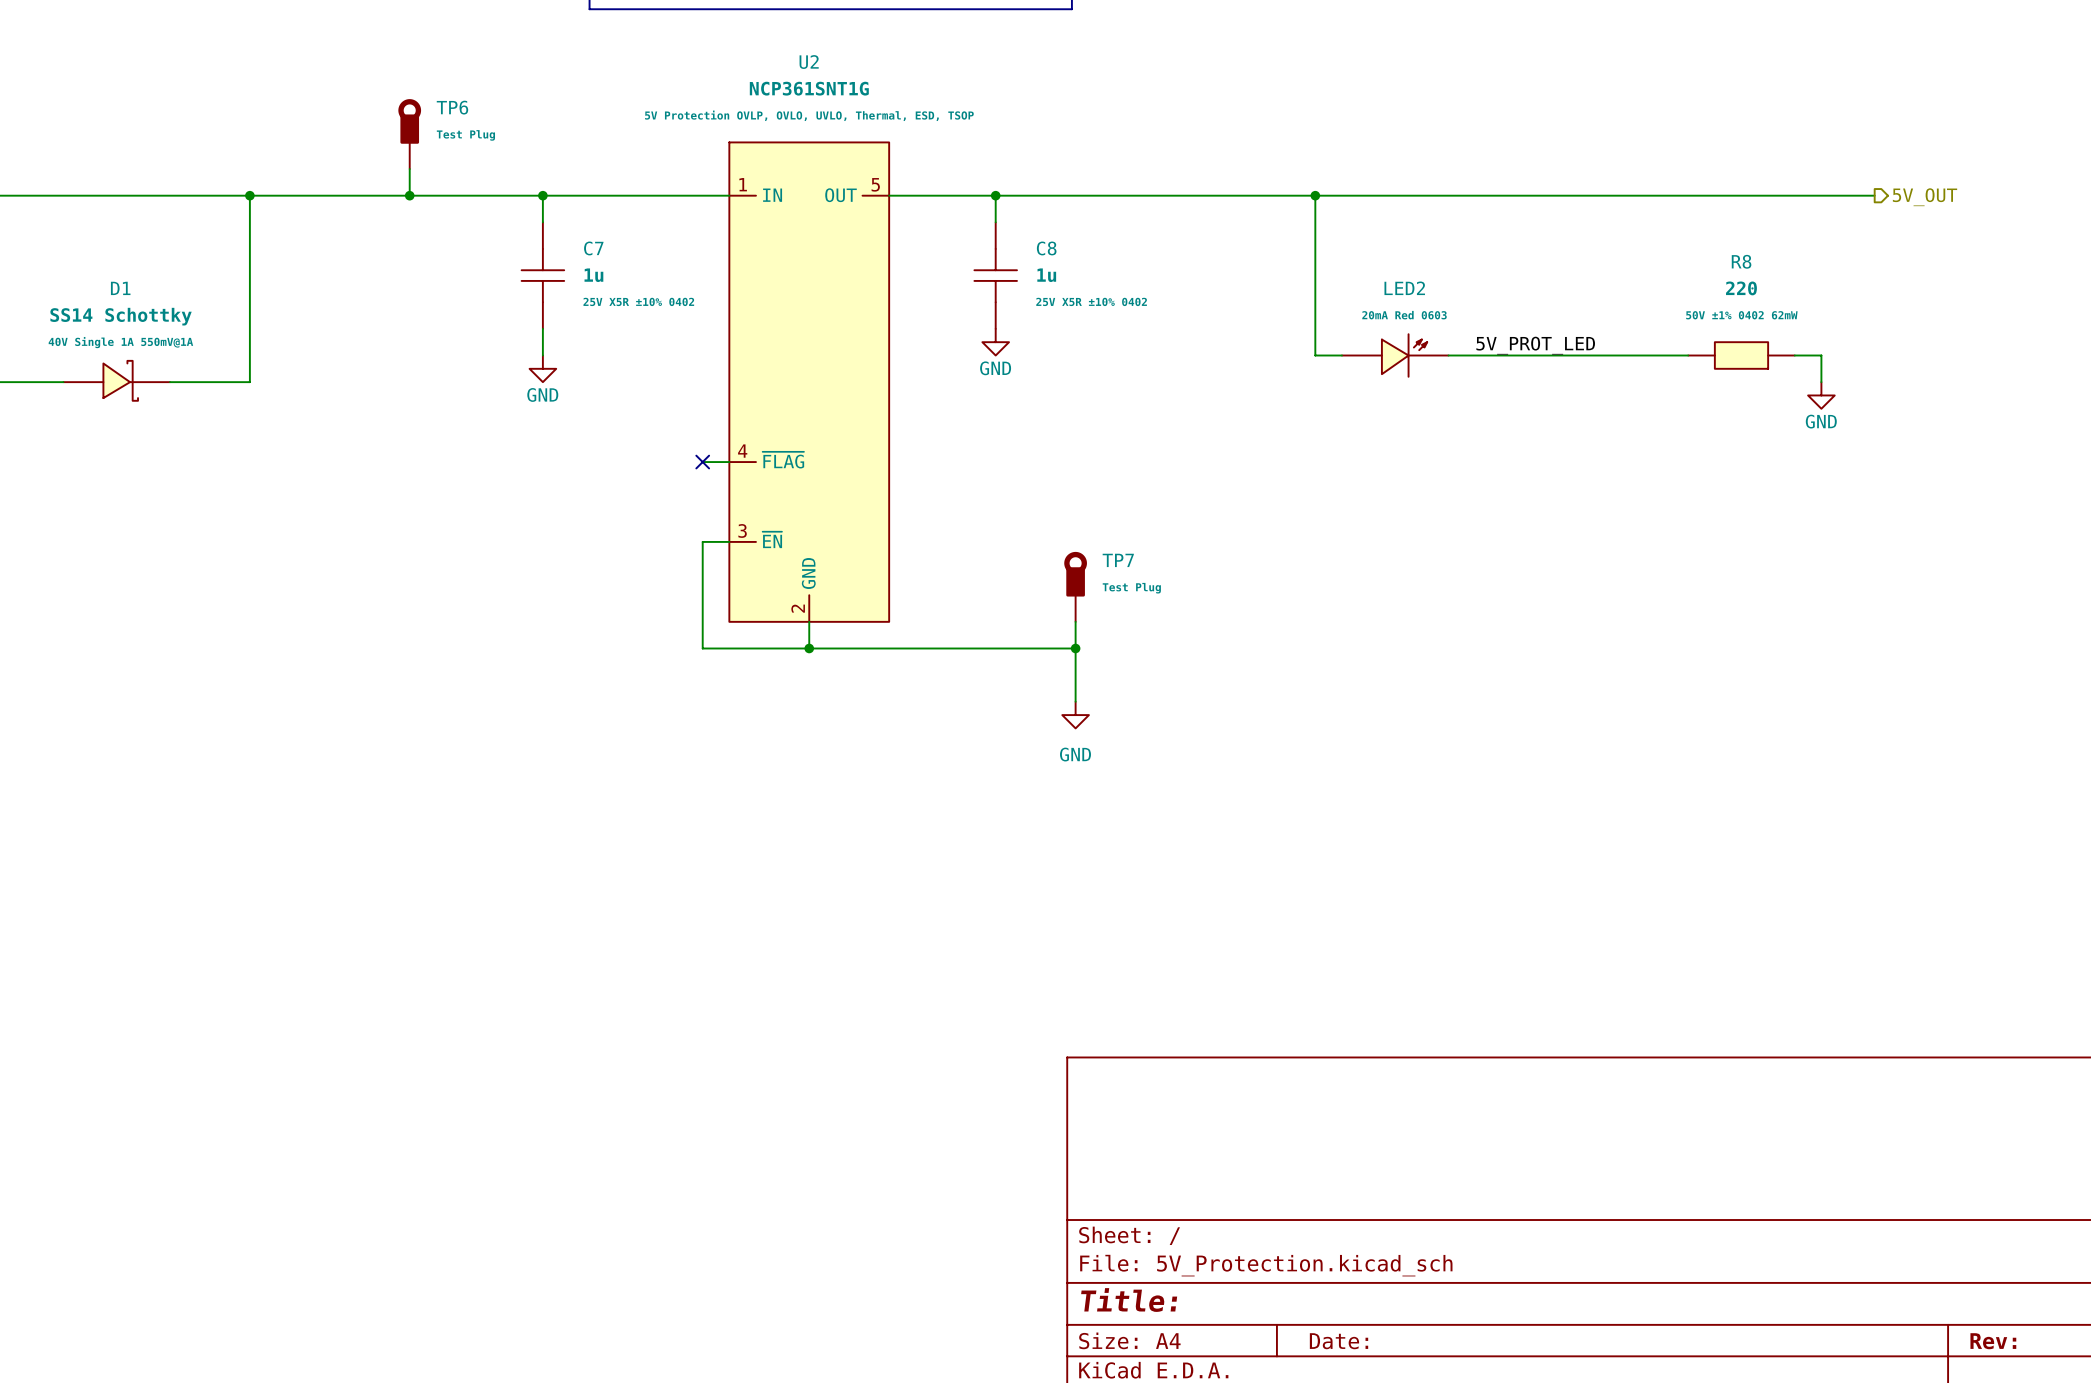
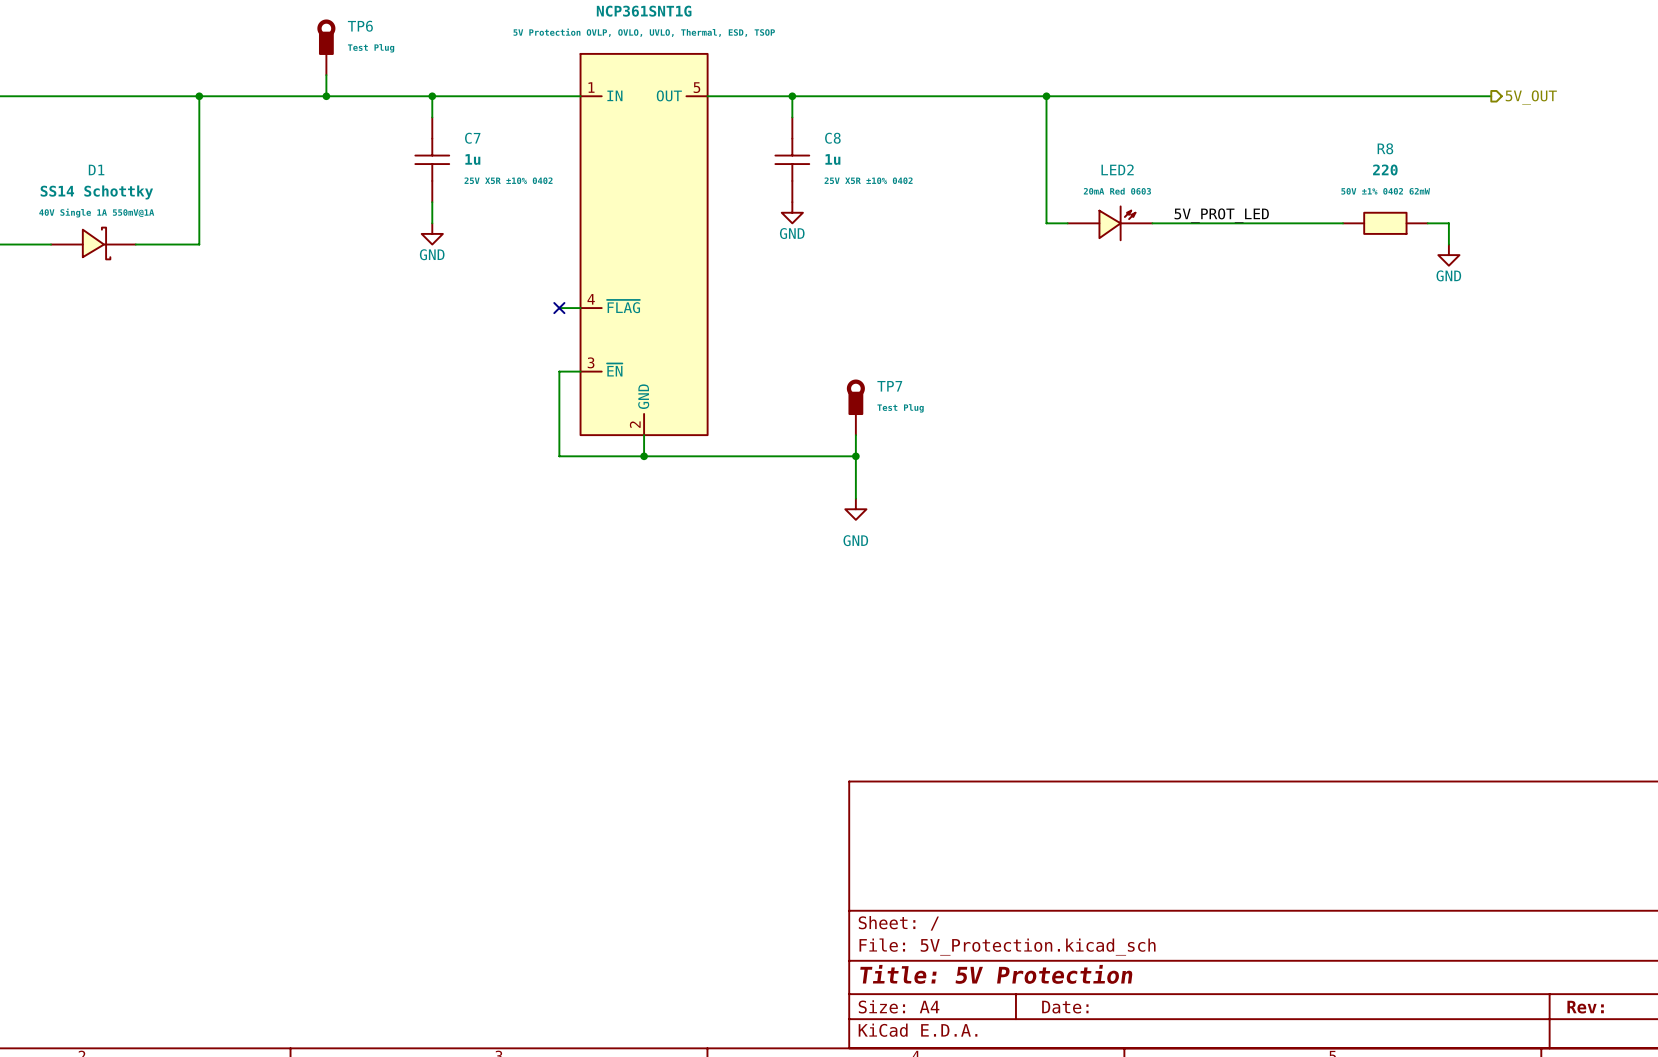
title block: Title: (1129, 1300) -> Title: 5V Protection (996, 974)

